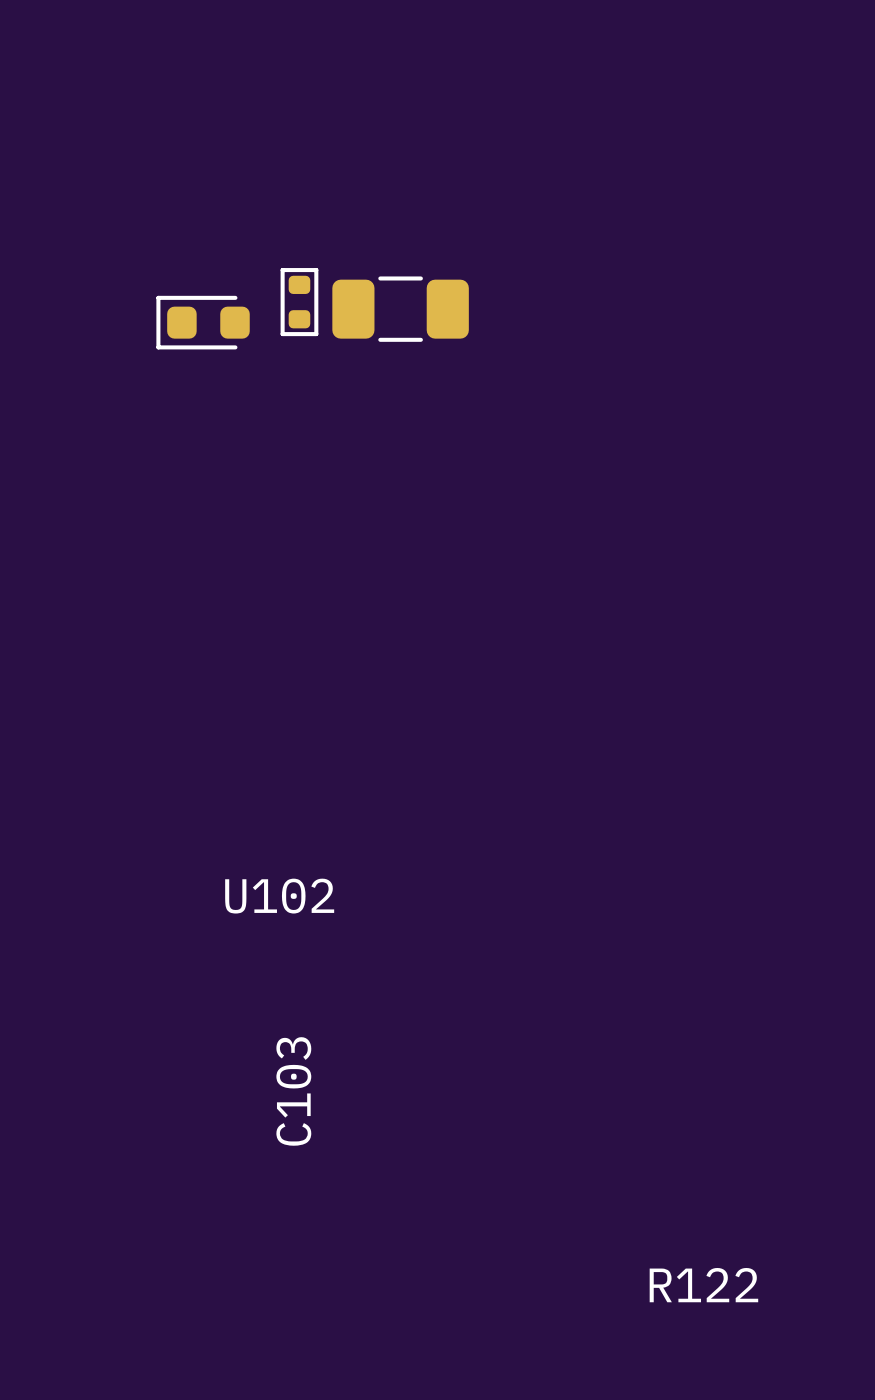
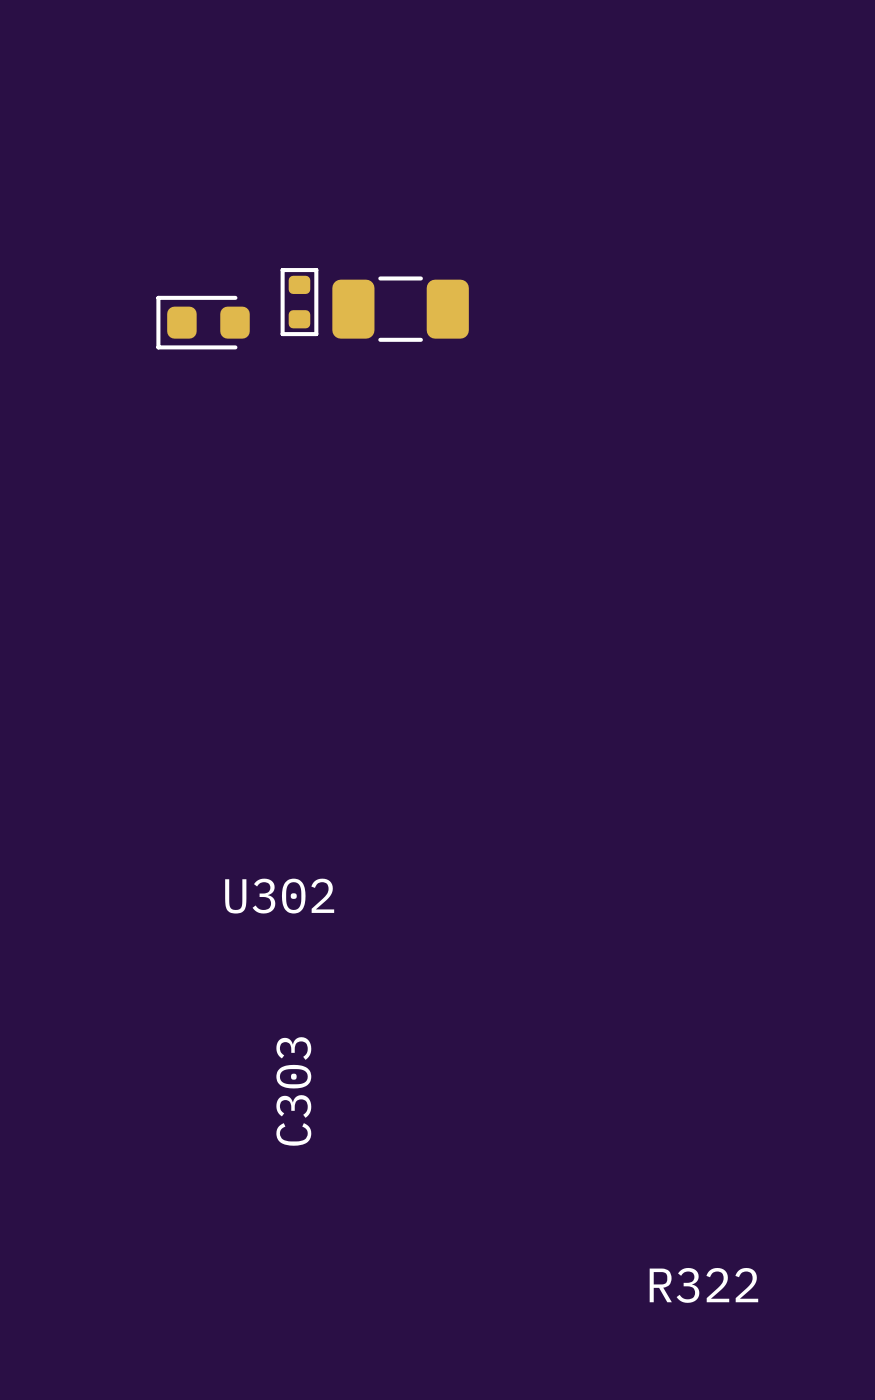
U102 name: U102 (279, 896) -> U302 (279, 896)
C103 name: C103 (293, 1091) -> C303 (293, 1091)
R122 name: R122 (703, 1285) -> R322 (703, 1285)

